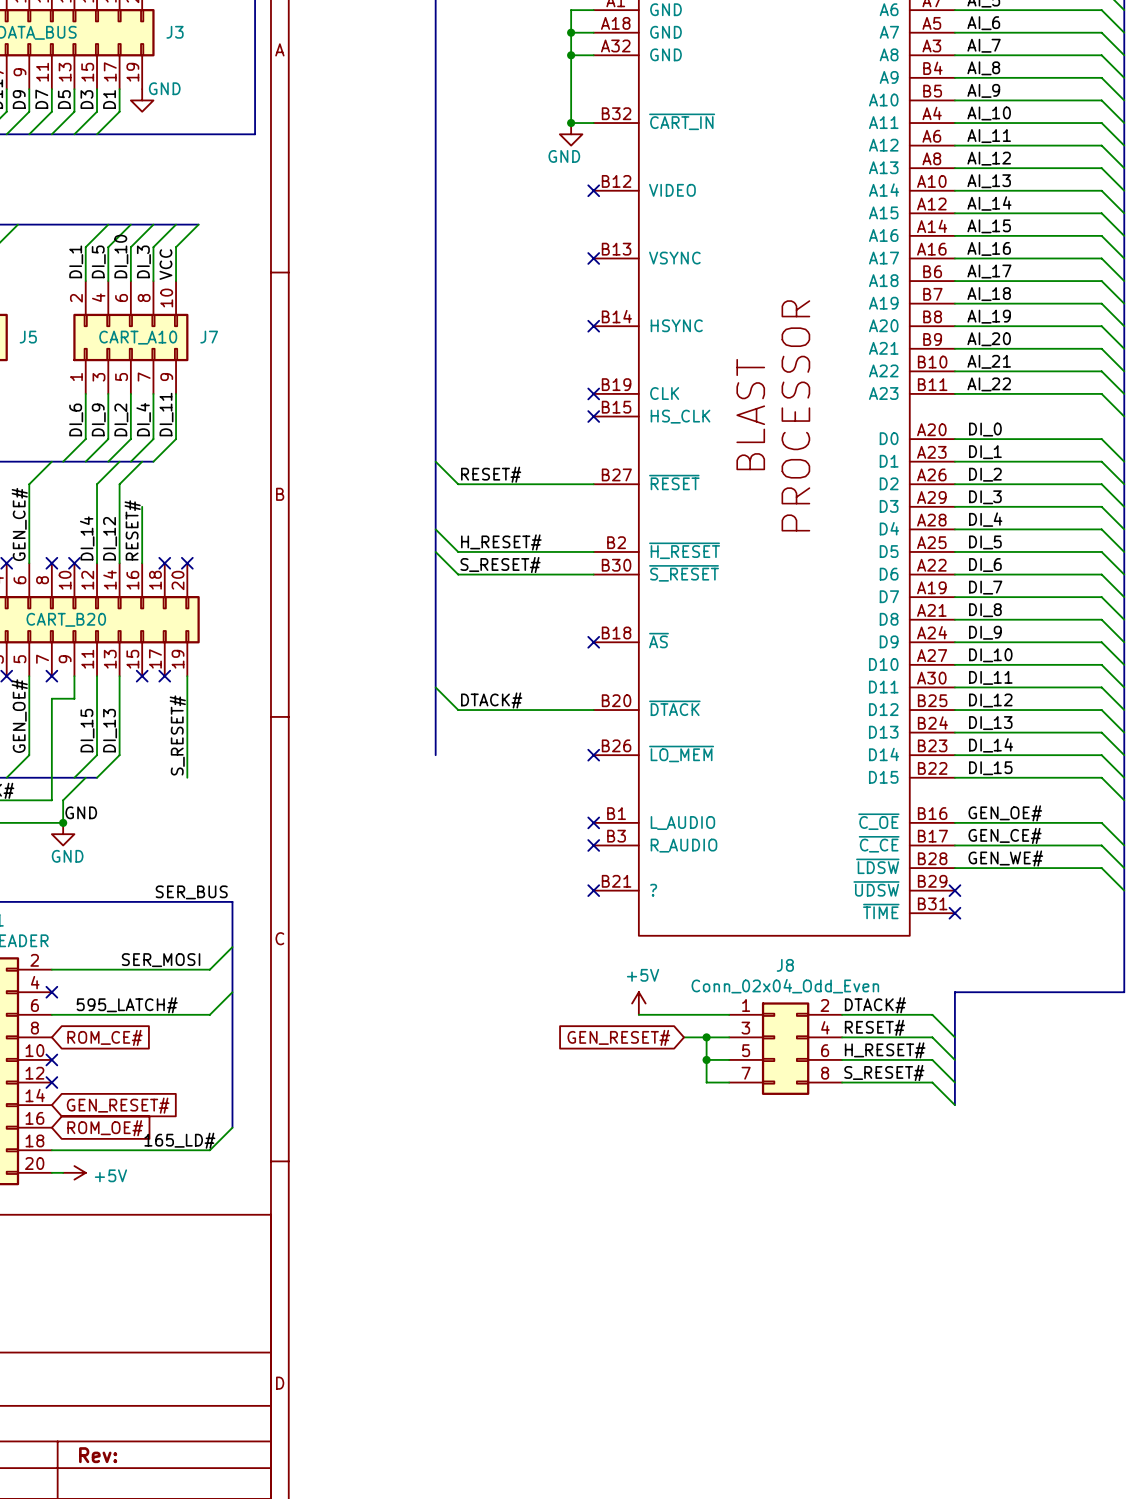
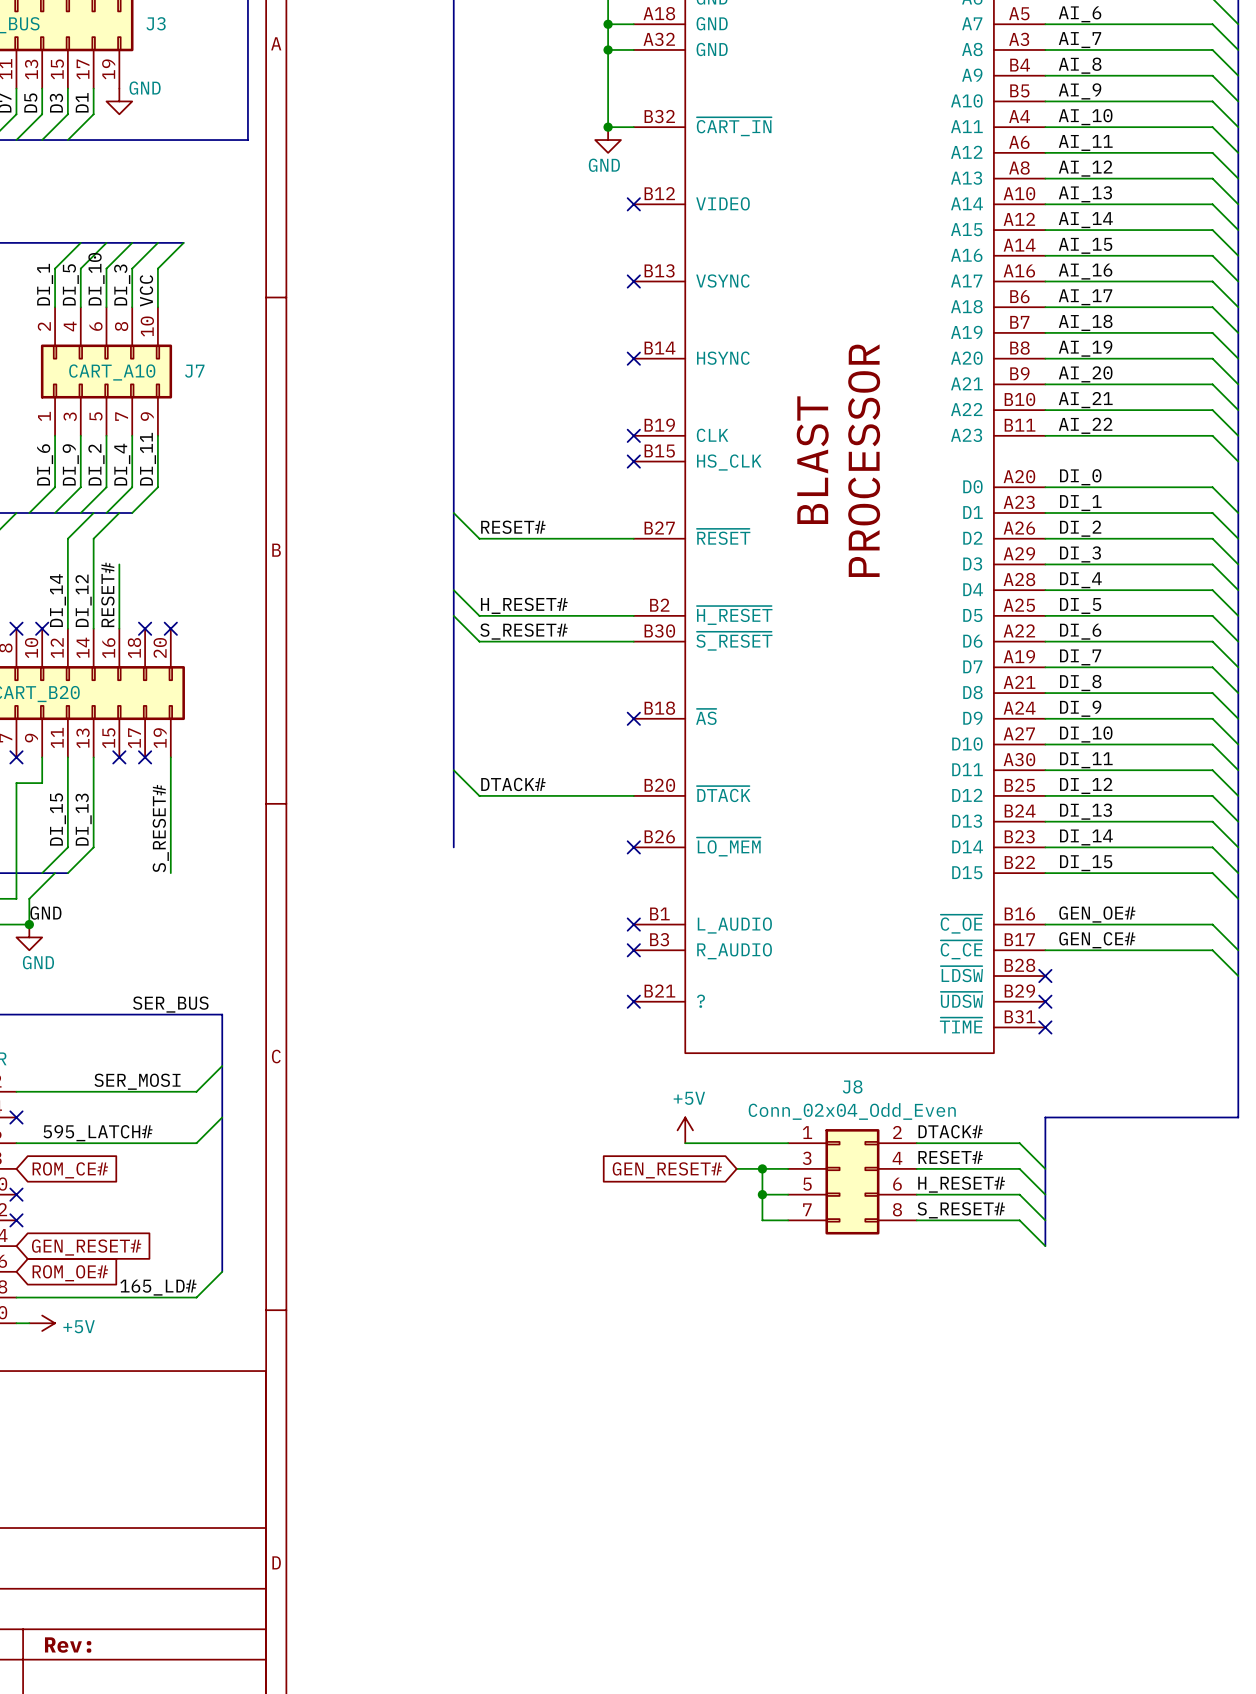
label: GEN_WE# (1005, 858) -> none
wire: (954, 868) (1101, 868) (1124, 890) -> none
no-connect mark: none -> (1045, 976)

